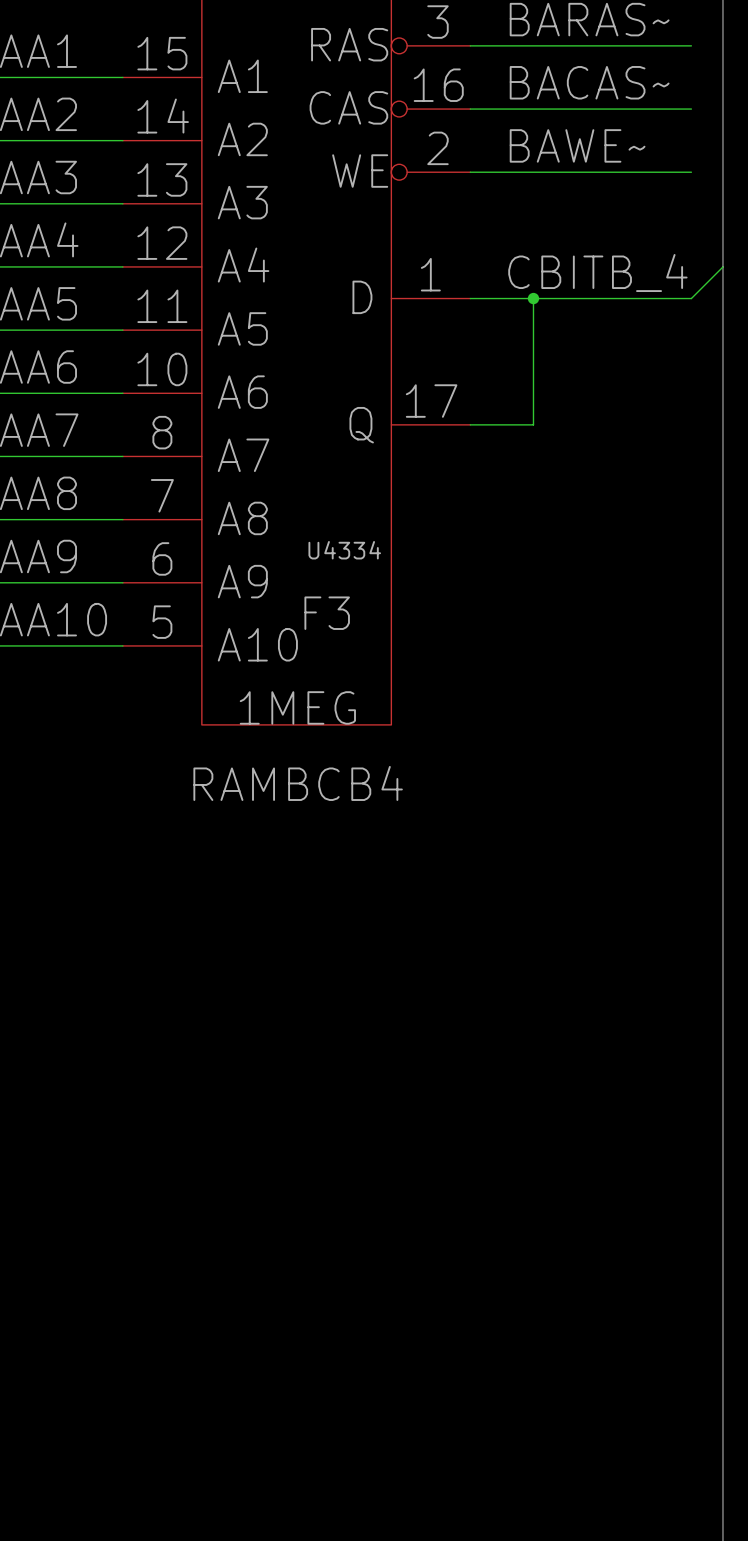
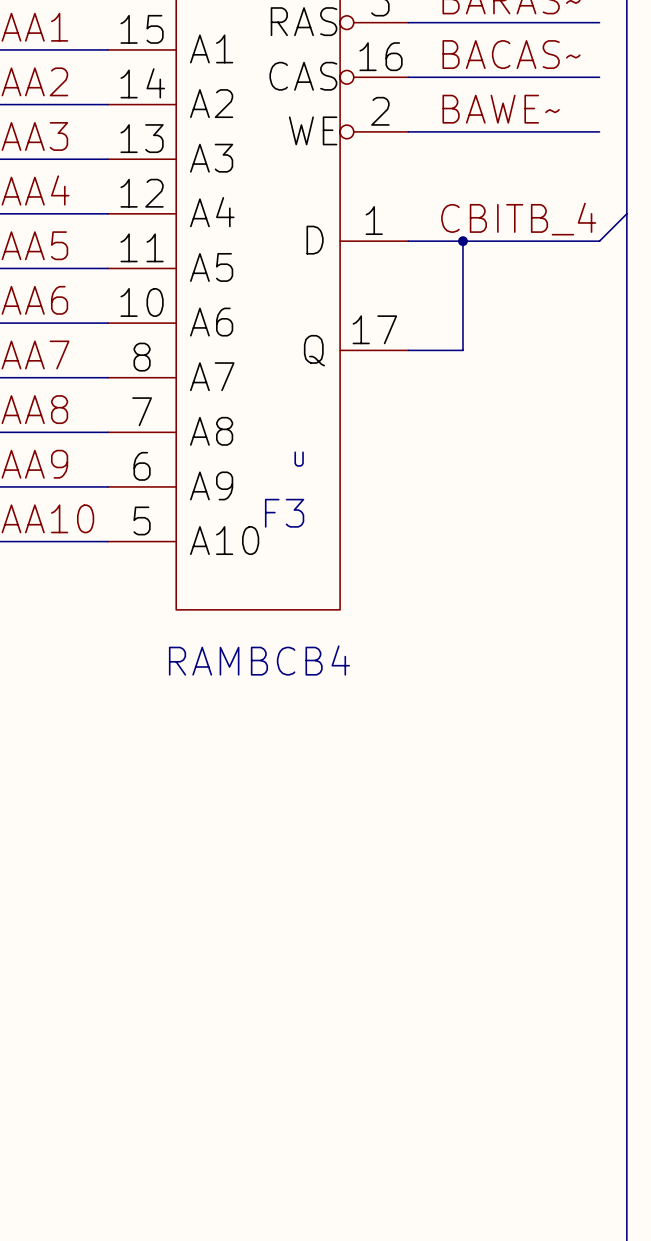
U4334 name: U4334 (344, 550) -> U (299, 459)
U4334 value: 1MEG (297, 707) -> none

